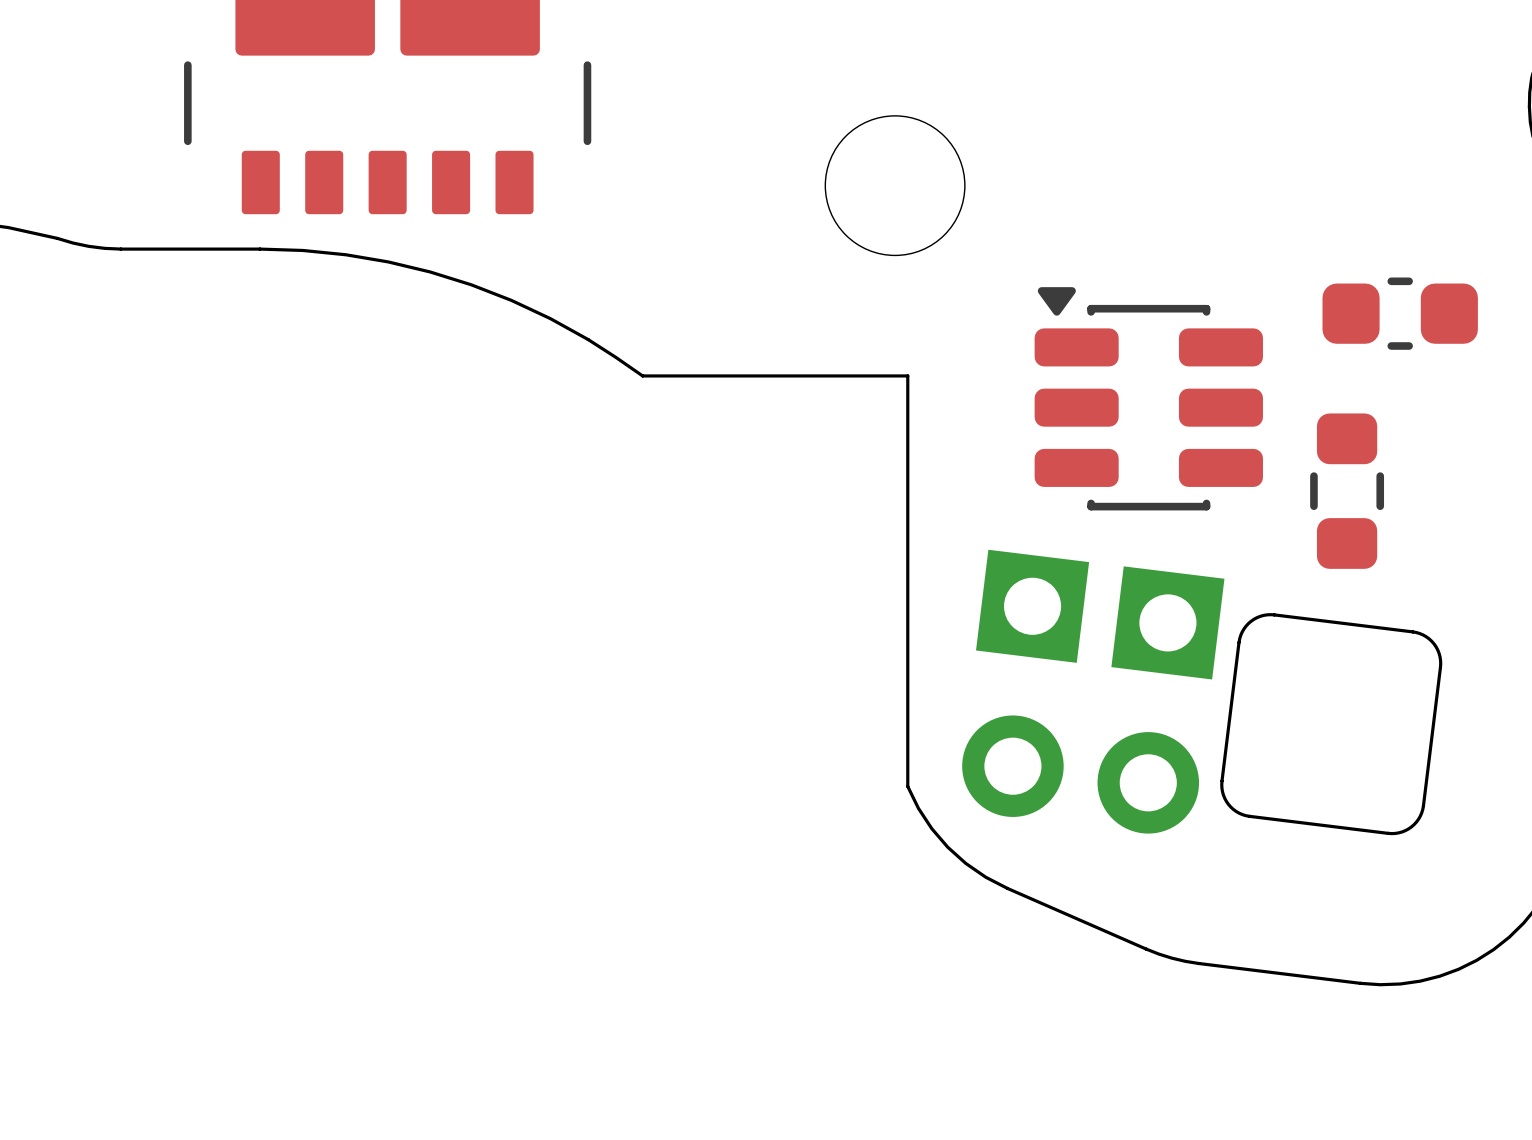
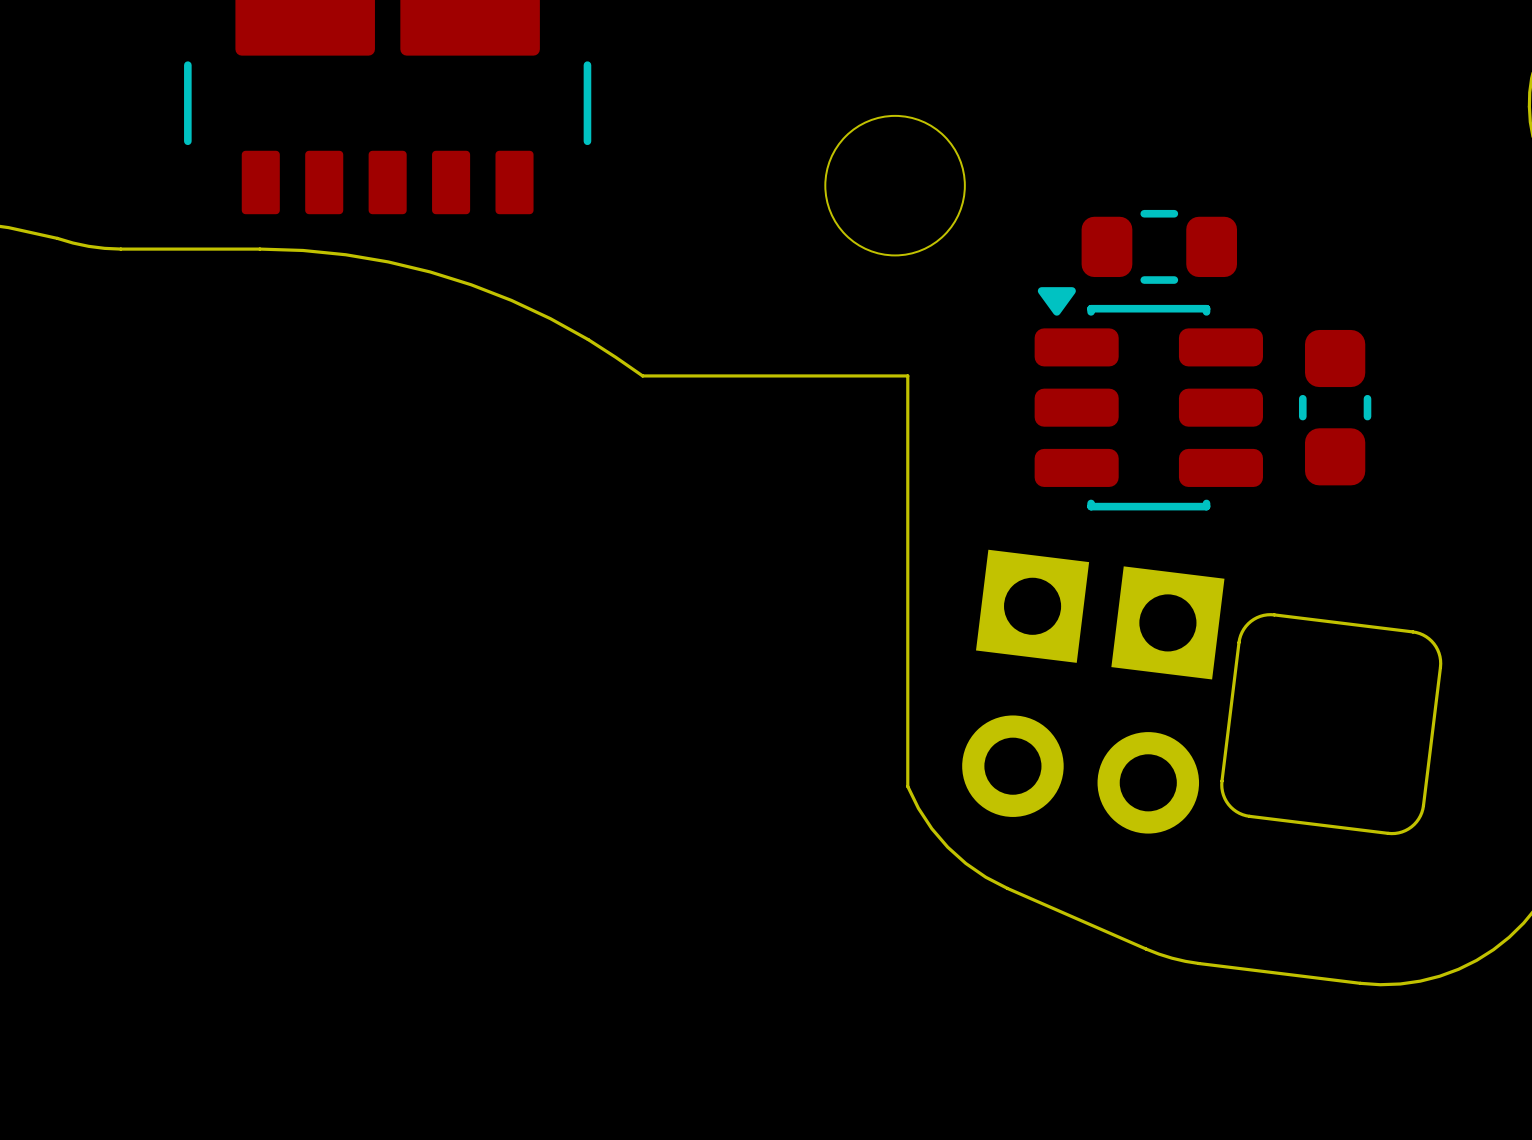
part rotation: 0° (1400, 313) -> 90° clockwise (1335, 407)
part position: (1400, 313) -> (1335, 407)
part rotation: 0° (1347, 491) -> 90° clockwise (1159, 246)
part position: (1347, 491) -> (1159, 246)

